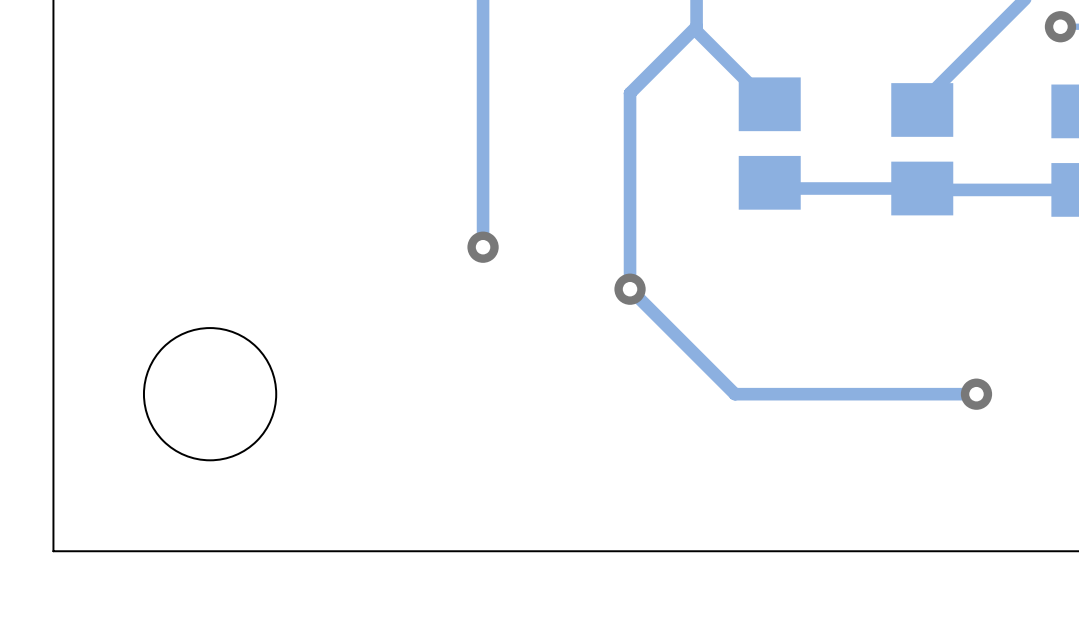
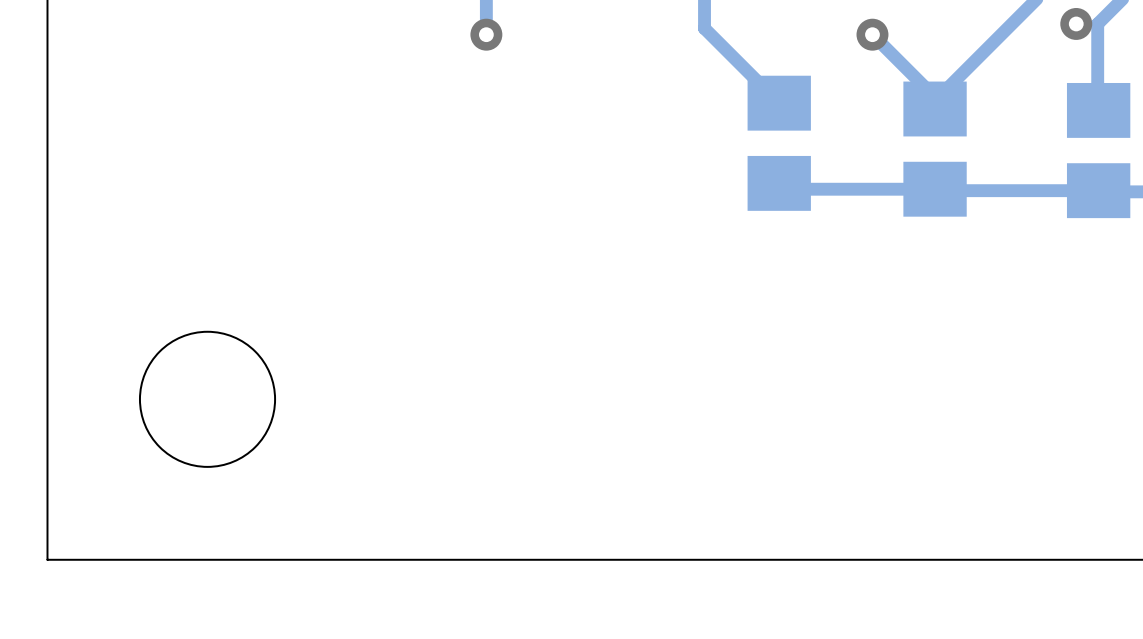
track: (696, 26) (630, 93) (630, 289) (735, 394) (976, 394) -> none
track: (483, 37) (483, 247) -> none
via: none -> (486, 34)
track: none -> (872, 34) (935, 97)
via: none -> (872, 34)
via: (483, 247) -> none
via: (630, 289) -> none
via: (976, 394) -> none

